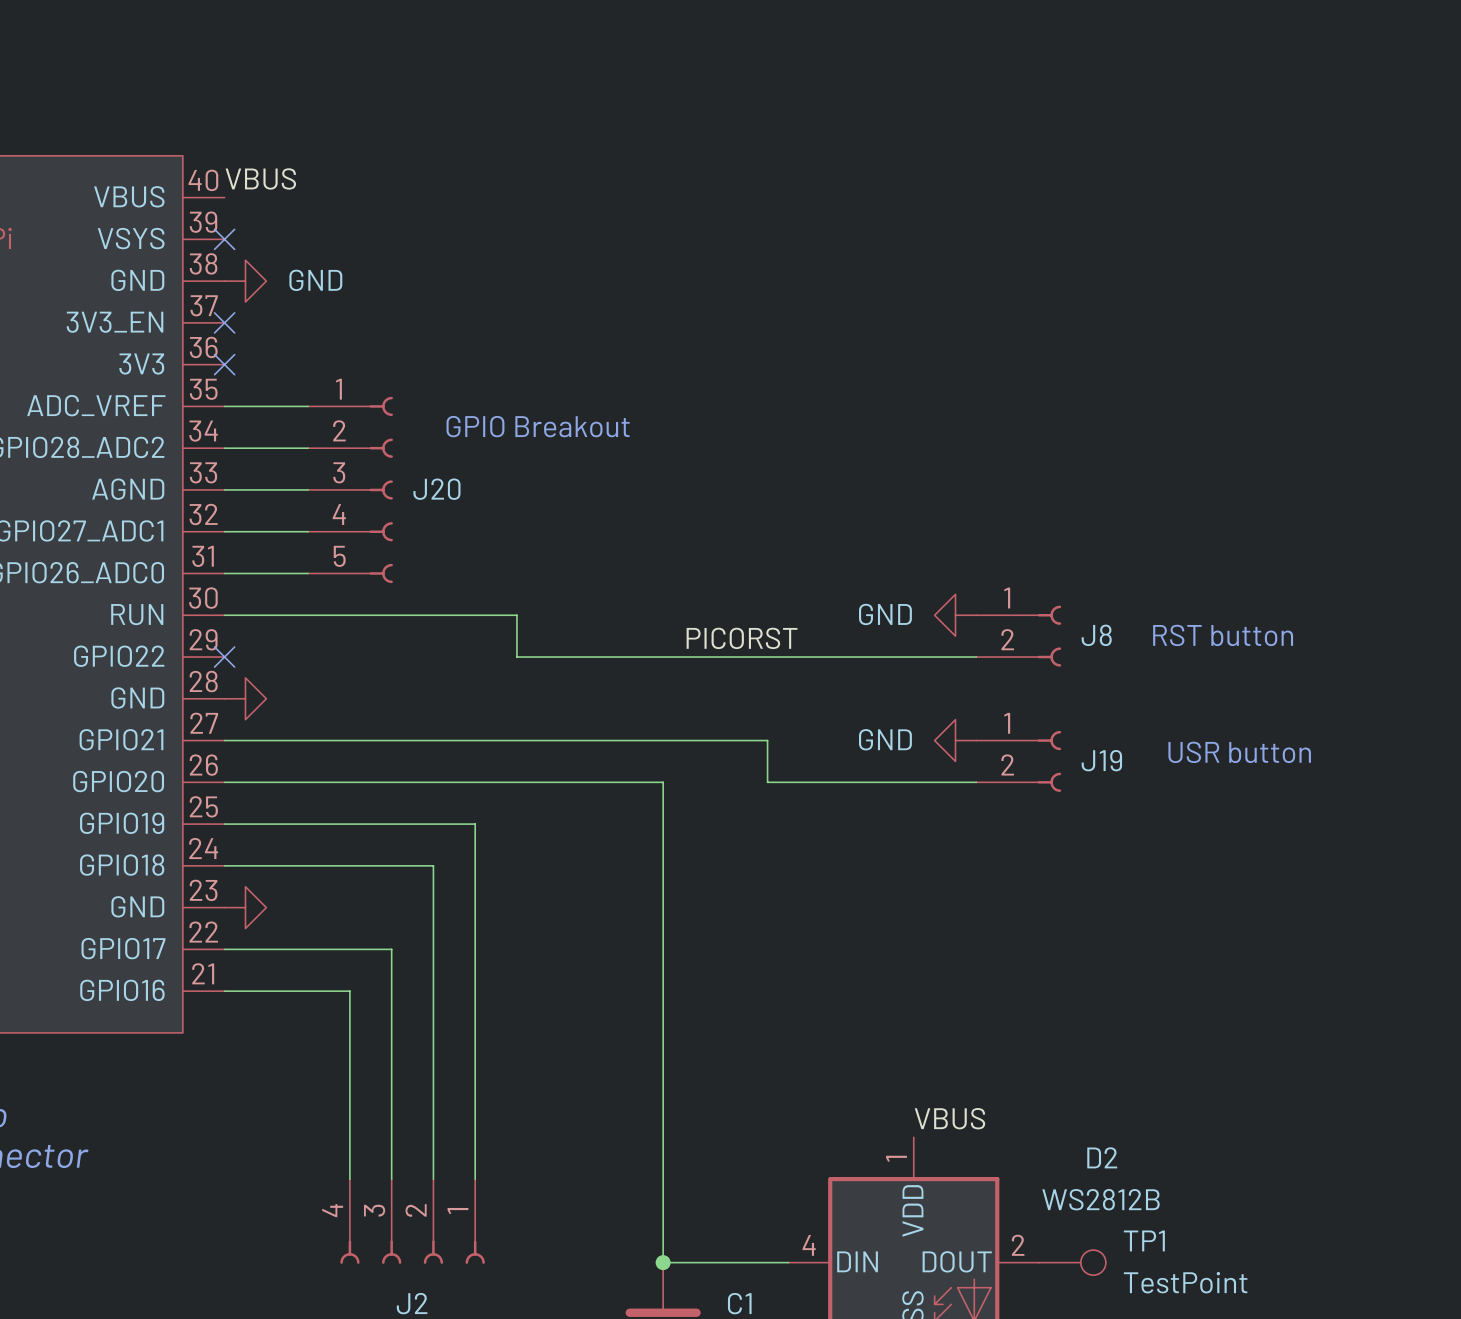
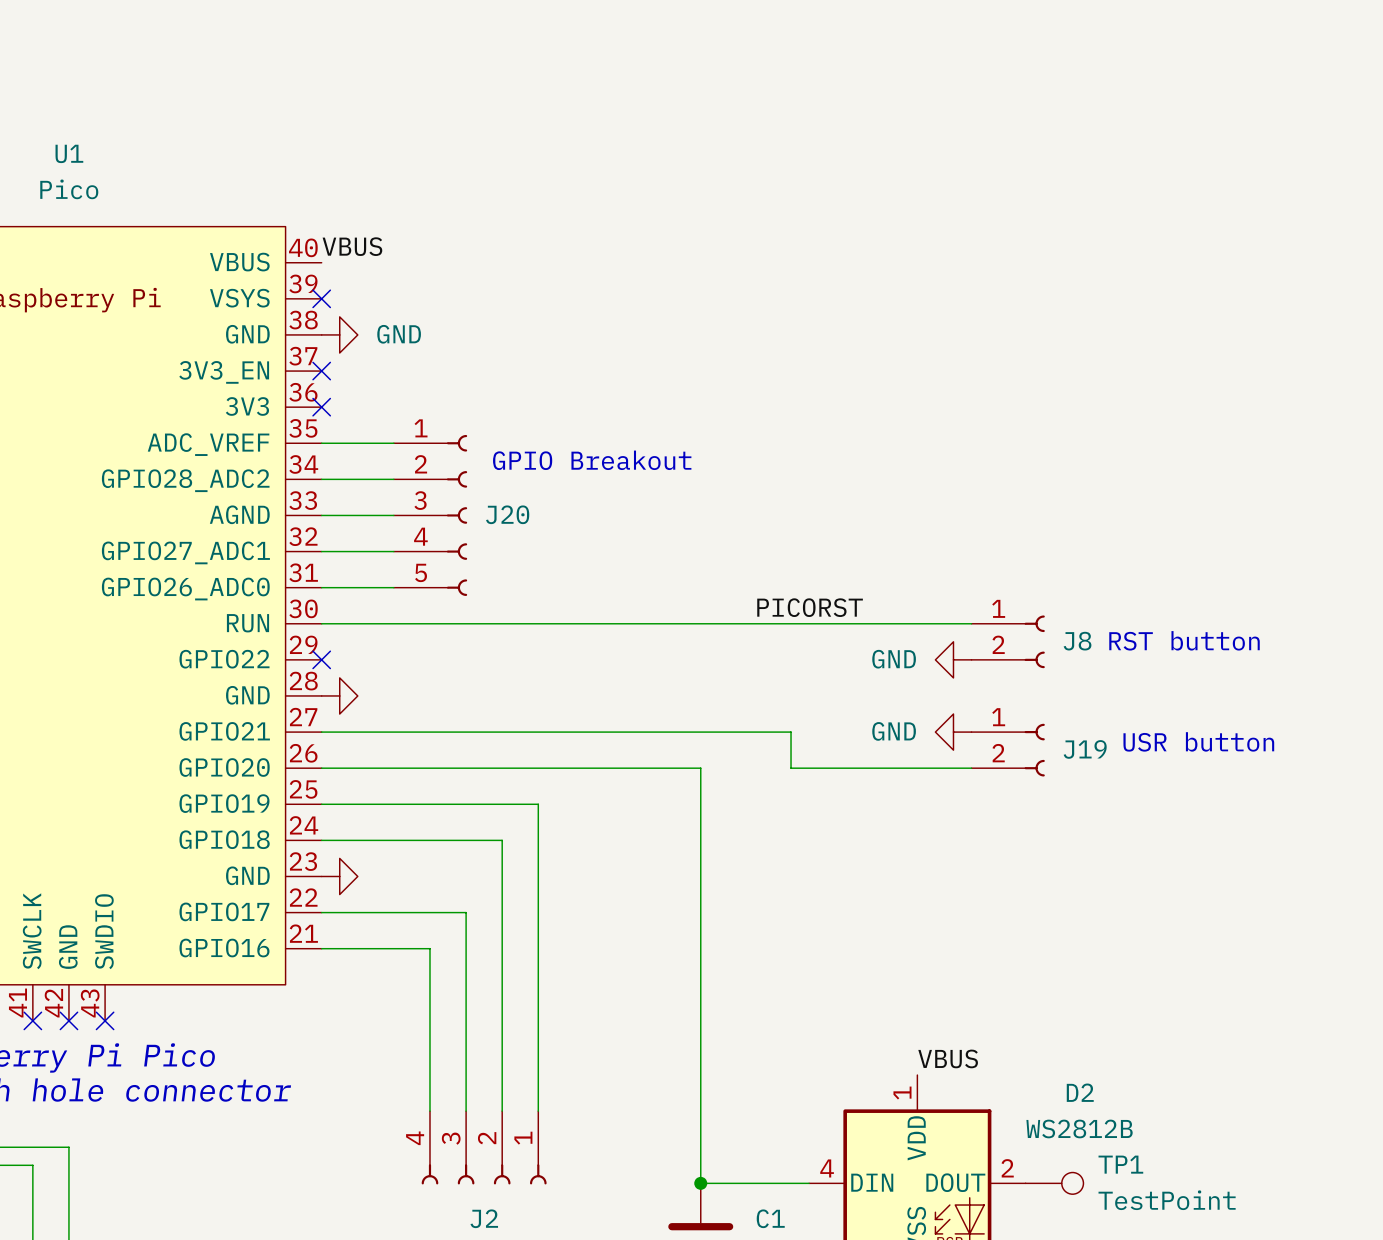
wire: (516, 615) (516, 657) (976, 657) -> (574, 623) (971, 623)
power symbol position: GND (955, 615) -> GND (953, 659)
label position: PICORST (742, 638) -> PICORST (810, 607)

